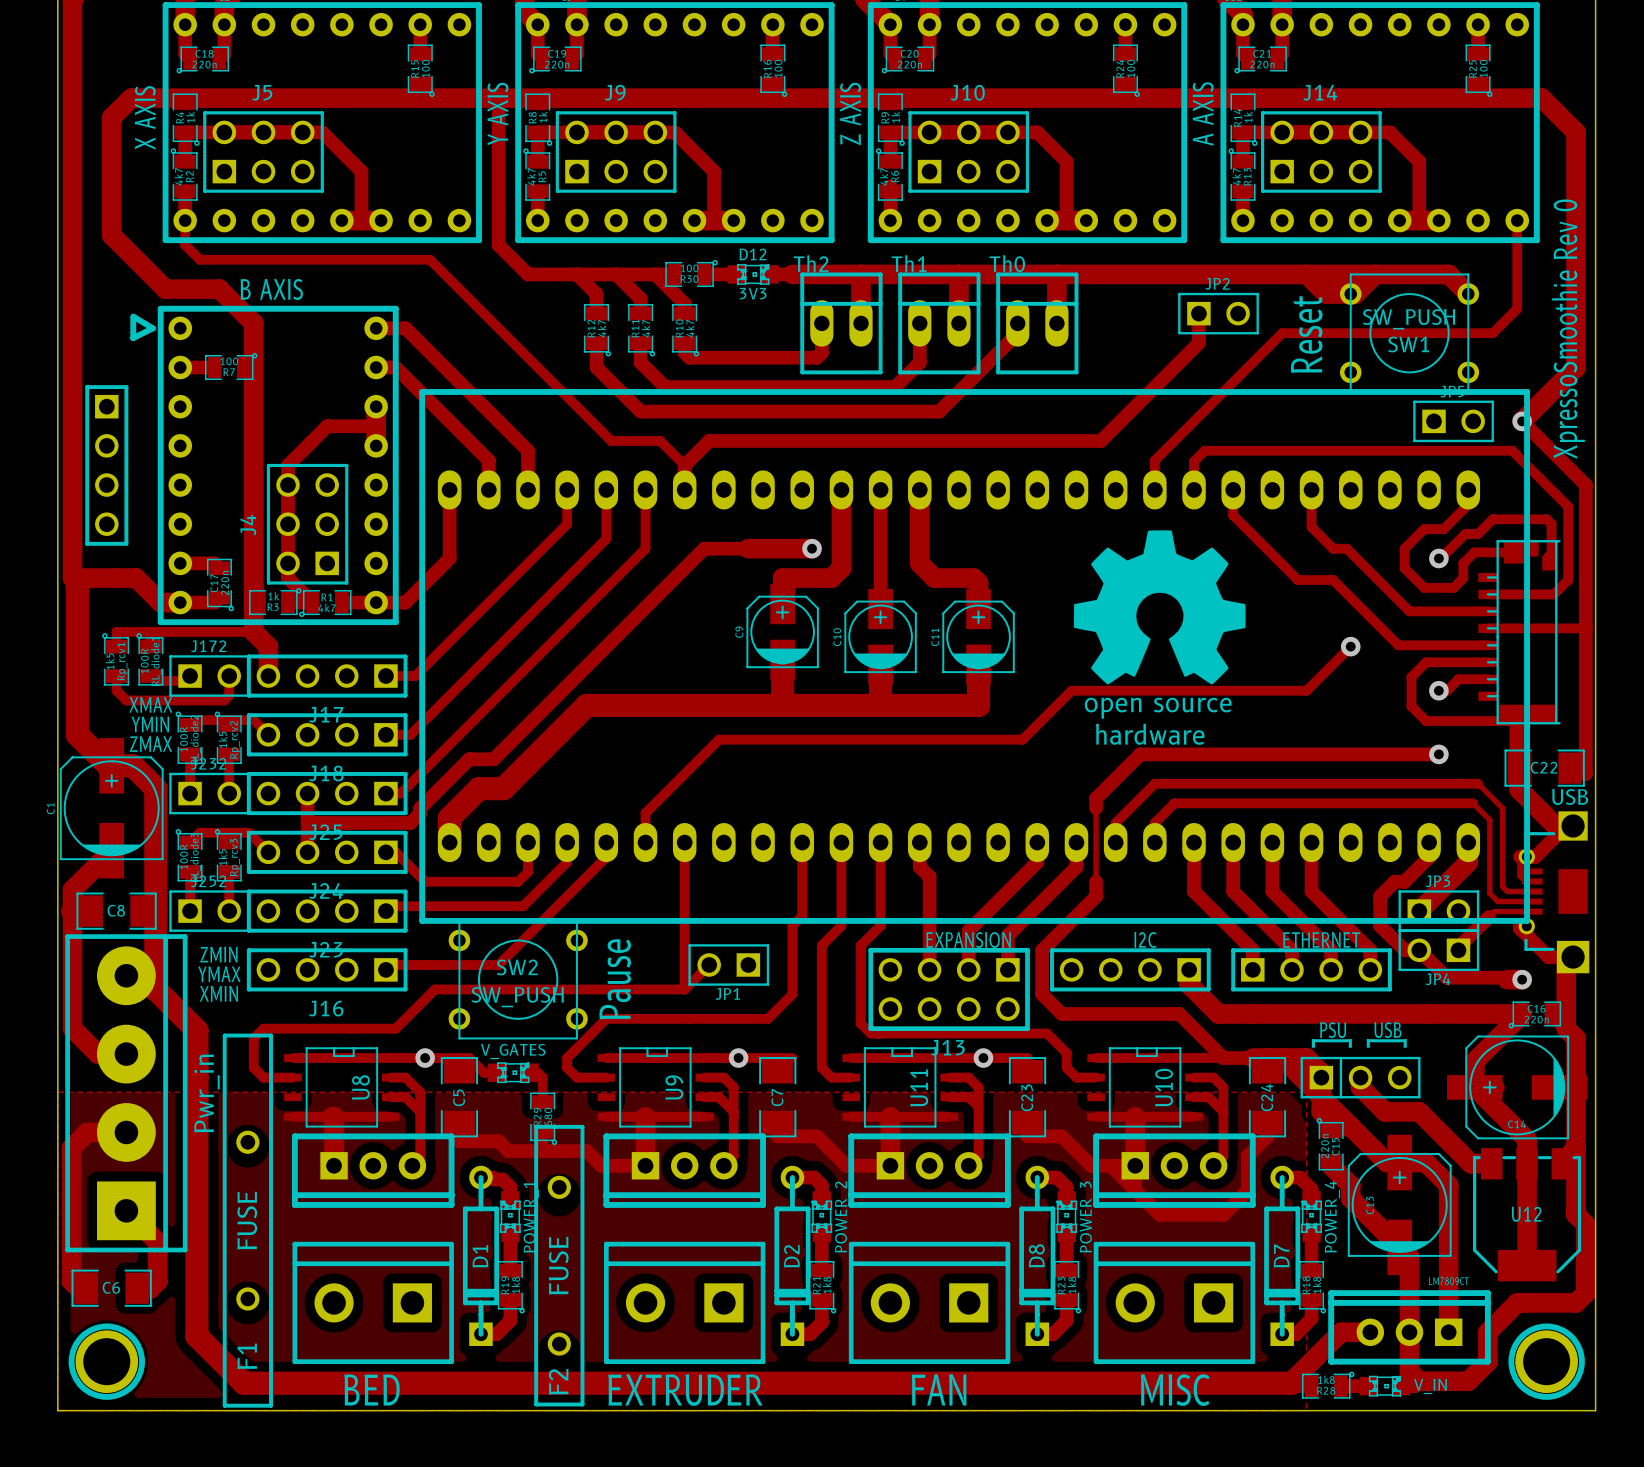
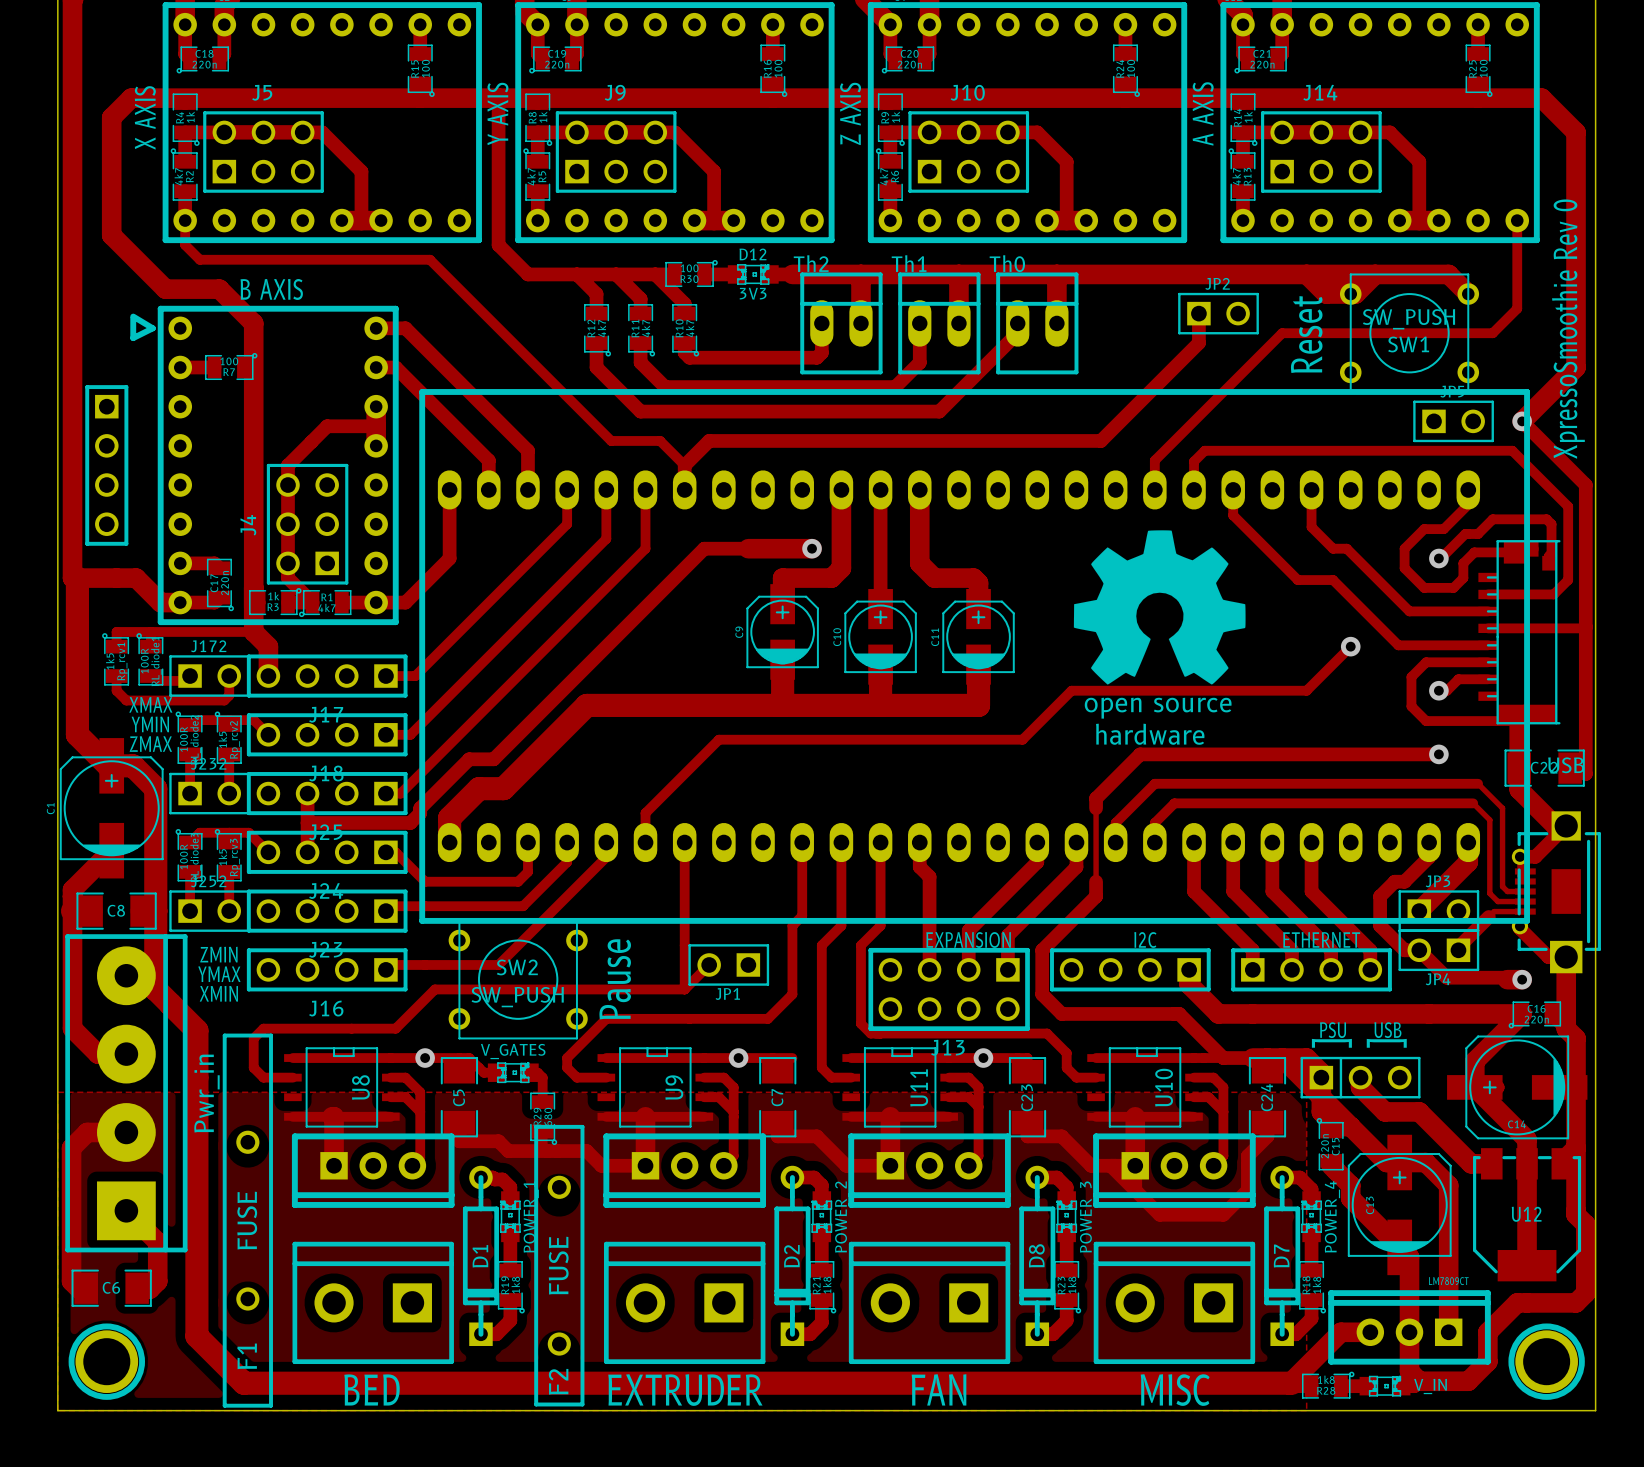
part value position: USB (1570, 796) -> USB (1566, 765)
part footprint: [1518, 811, 1590, 974] -> [1511, 811, 1601, 974]

